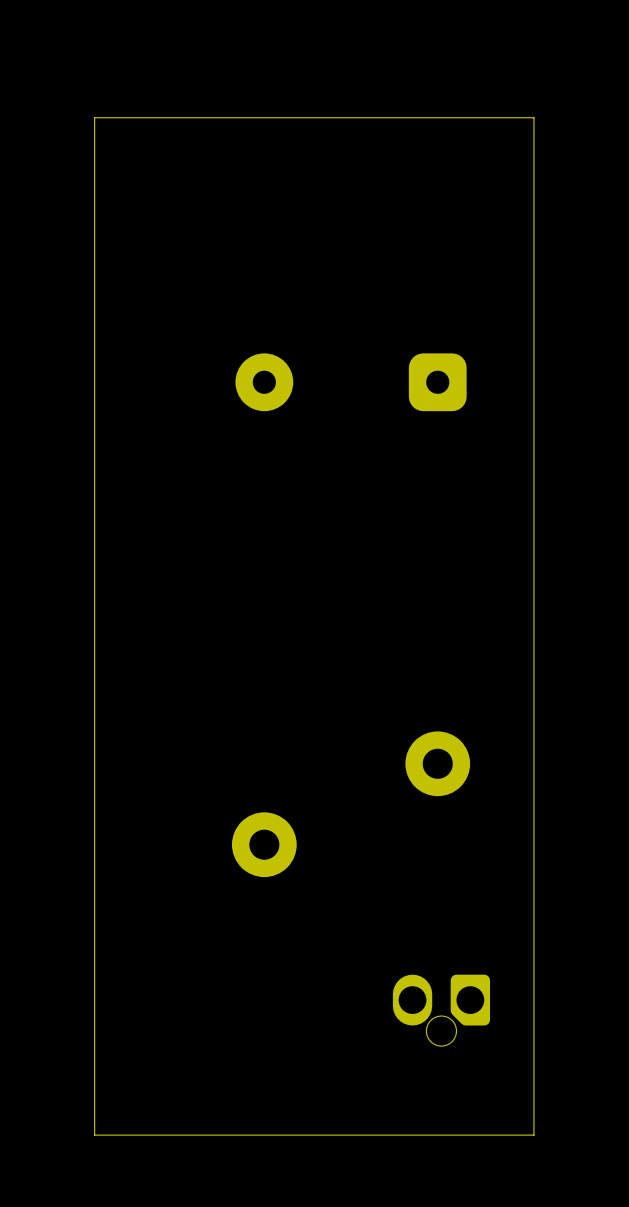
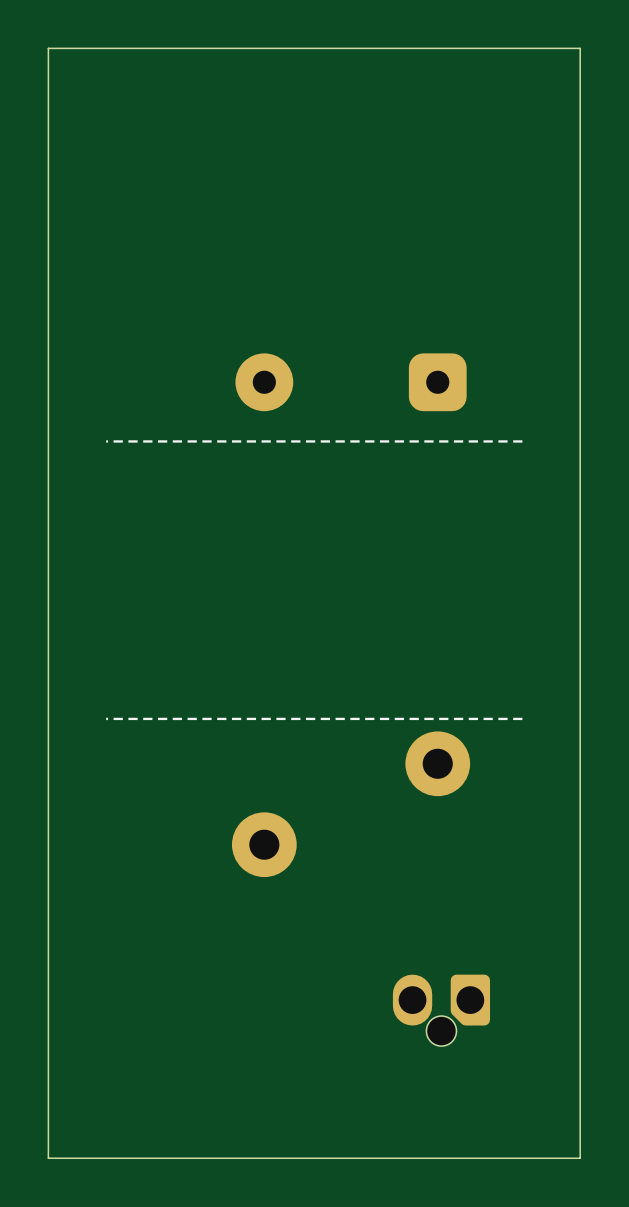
board edge: (533, 117) (94, 117) (94, 1135) (533, 1135) (533, 117) -> (580, 48) (580, 1158) (48, 1158) (48, 48) (580, 48)
line: none -> (522, 441) (106, 441)
line: none -> (522, 718) (106, 718)

